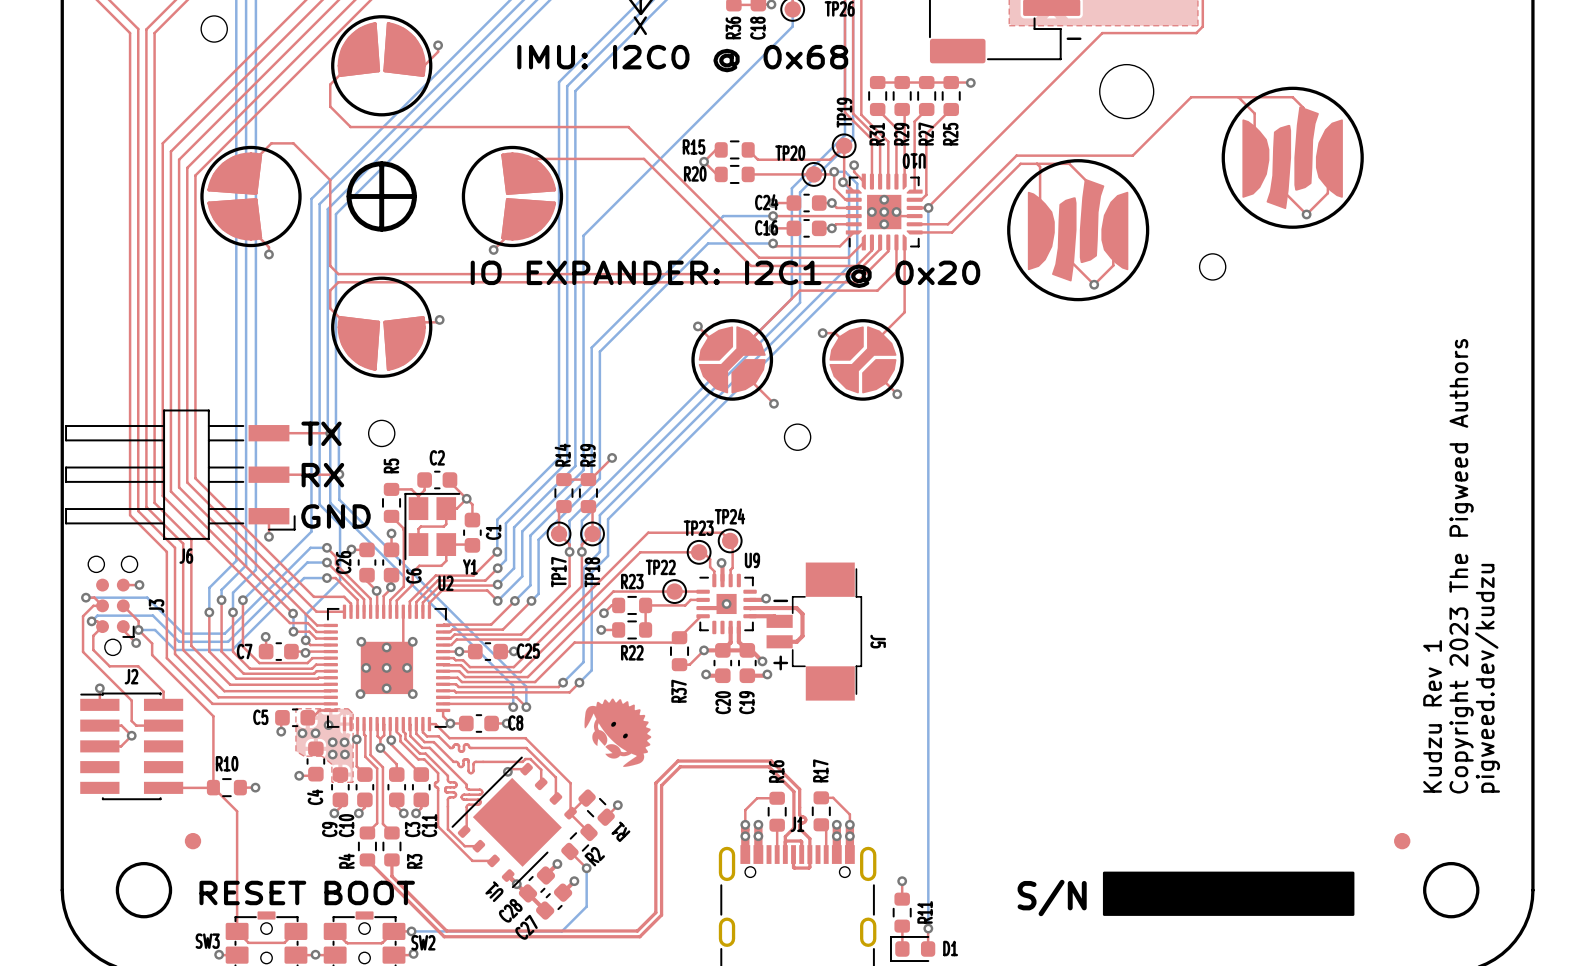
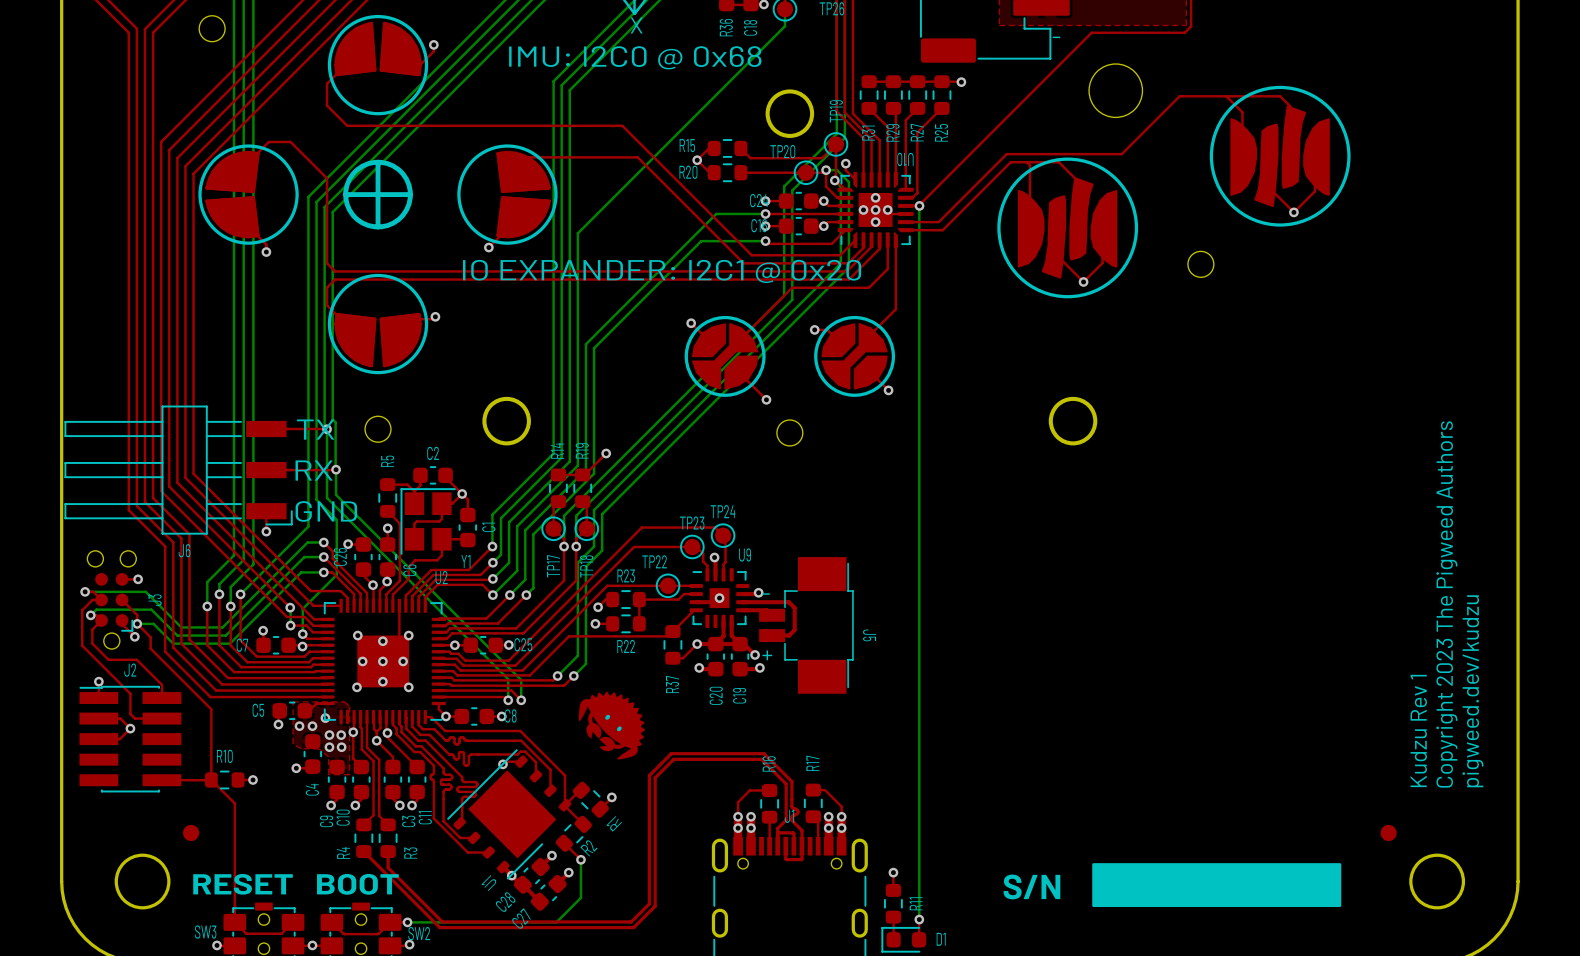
round board edge: none -> [765, 89, 815, 138]
round board edge: none -> [482, 396, 531, 446]
round board edge: none -> [1048, 396, 1098, 446]

